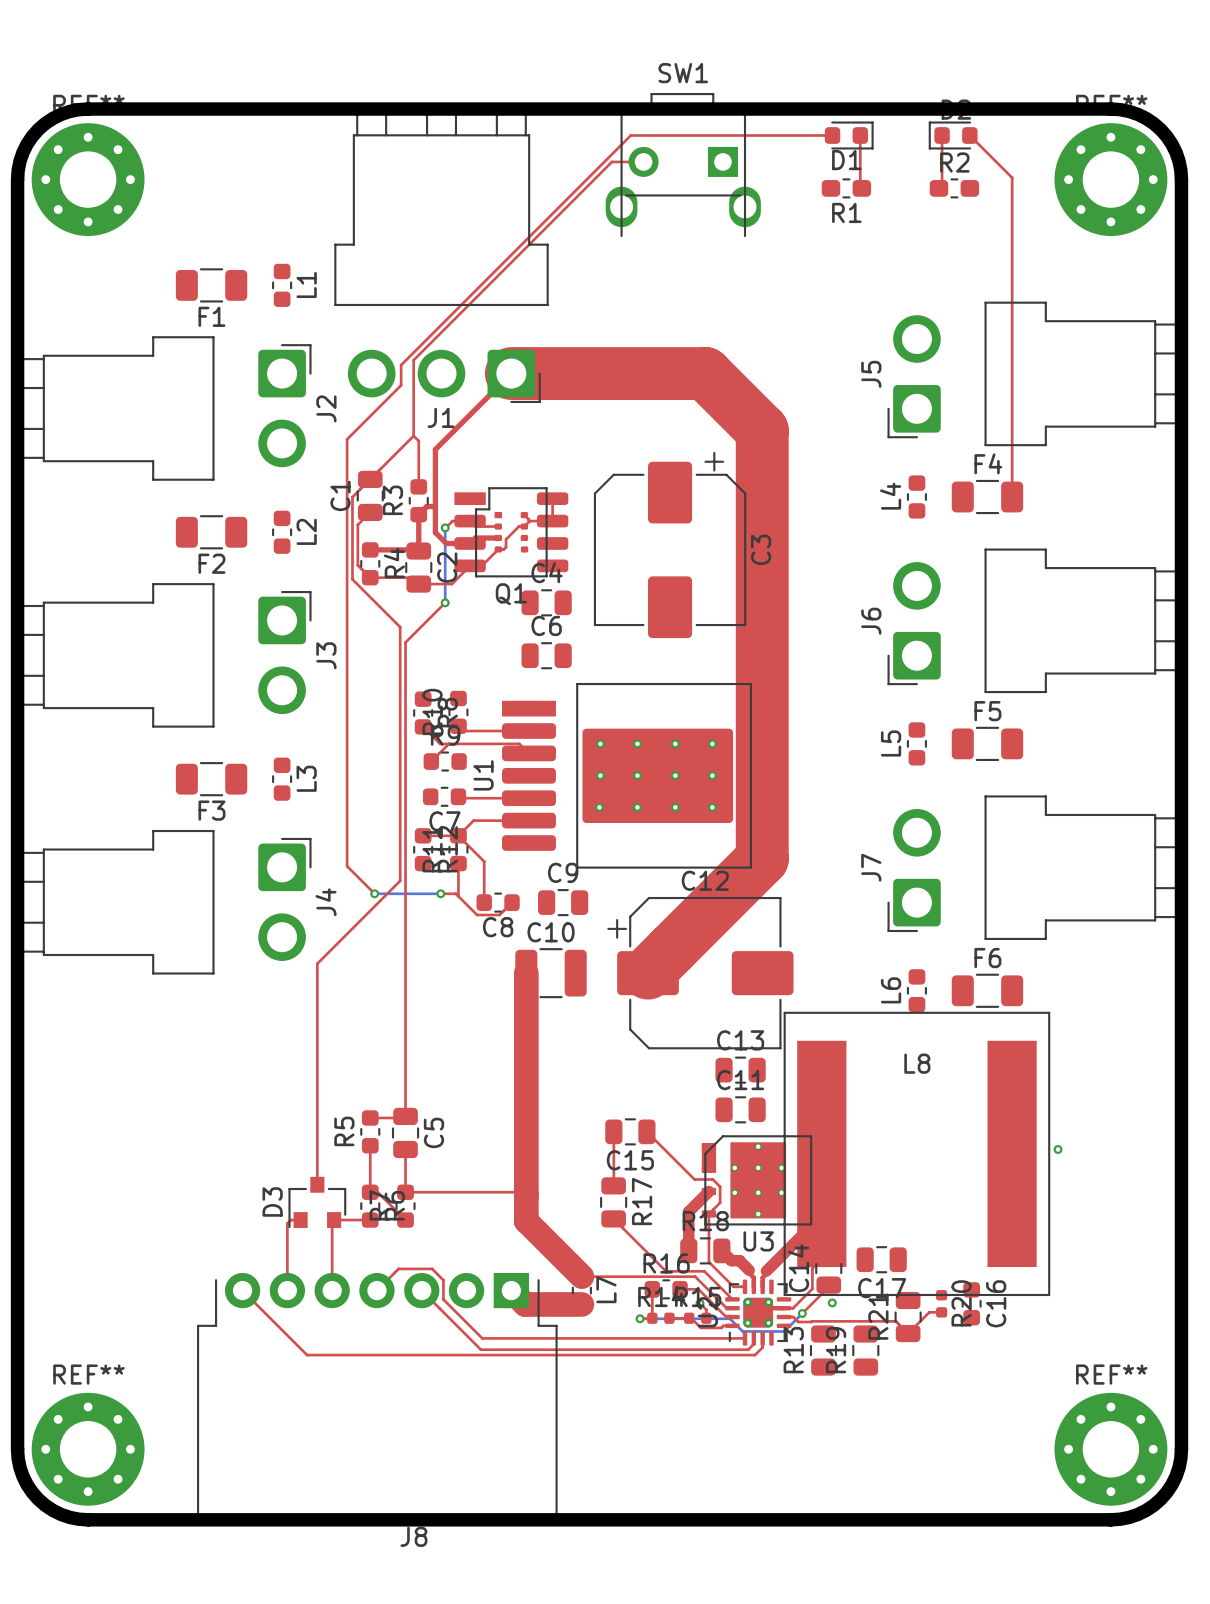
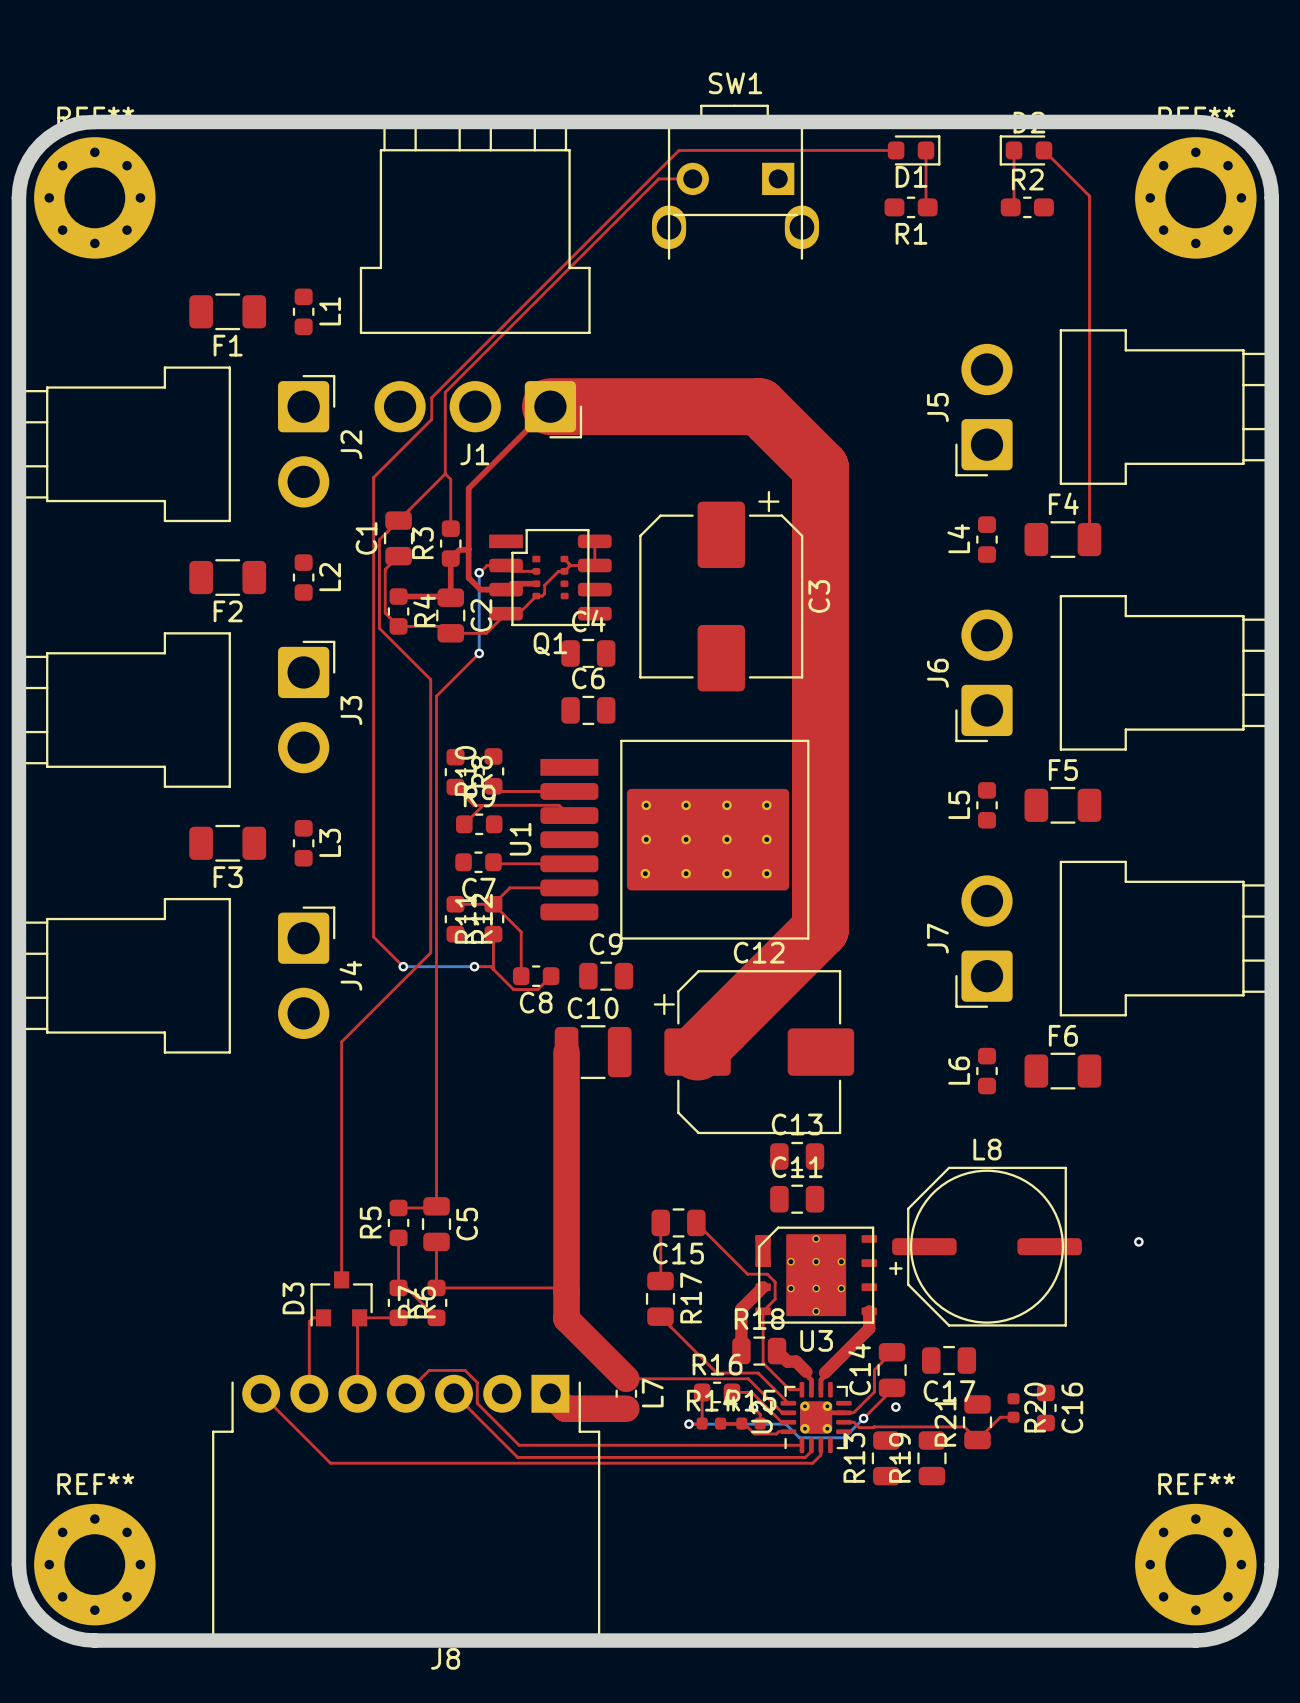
L8 footprint: [783, 1011, 1051, 1297] -> [889, 1166, 1082, 1327]

